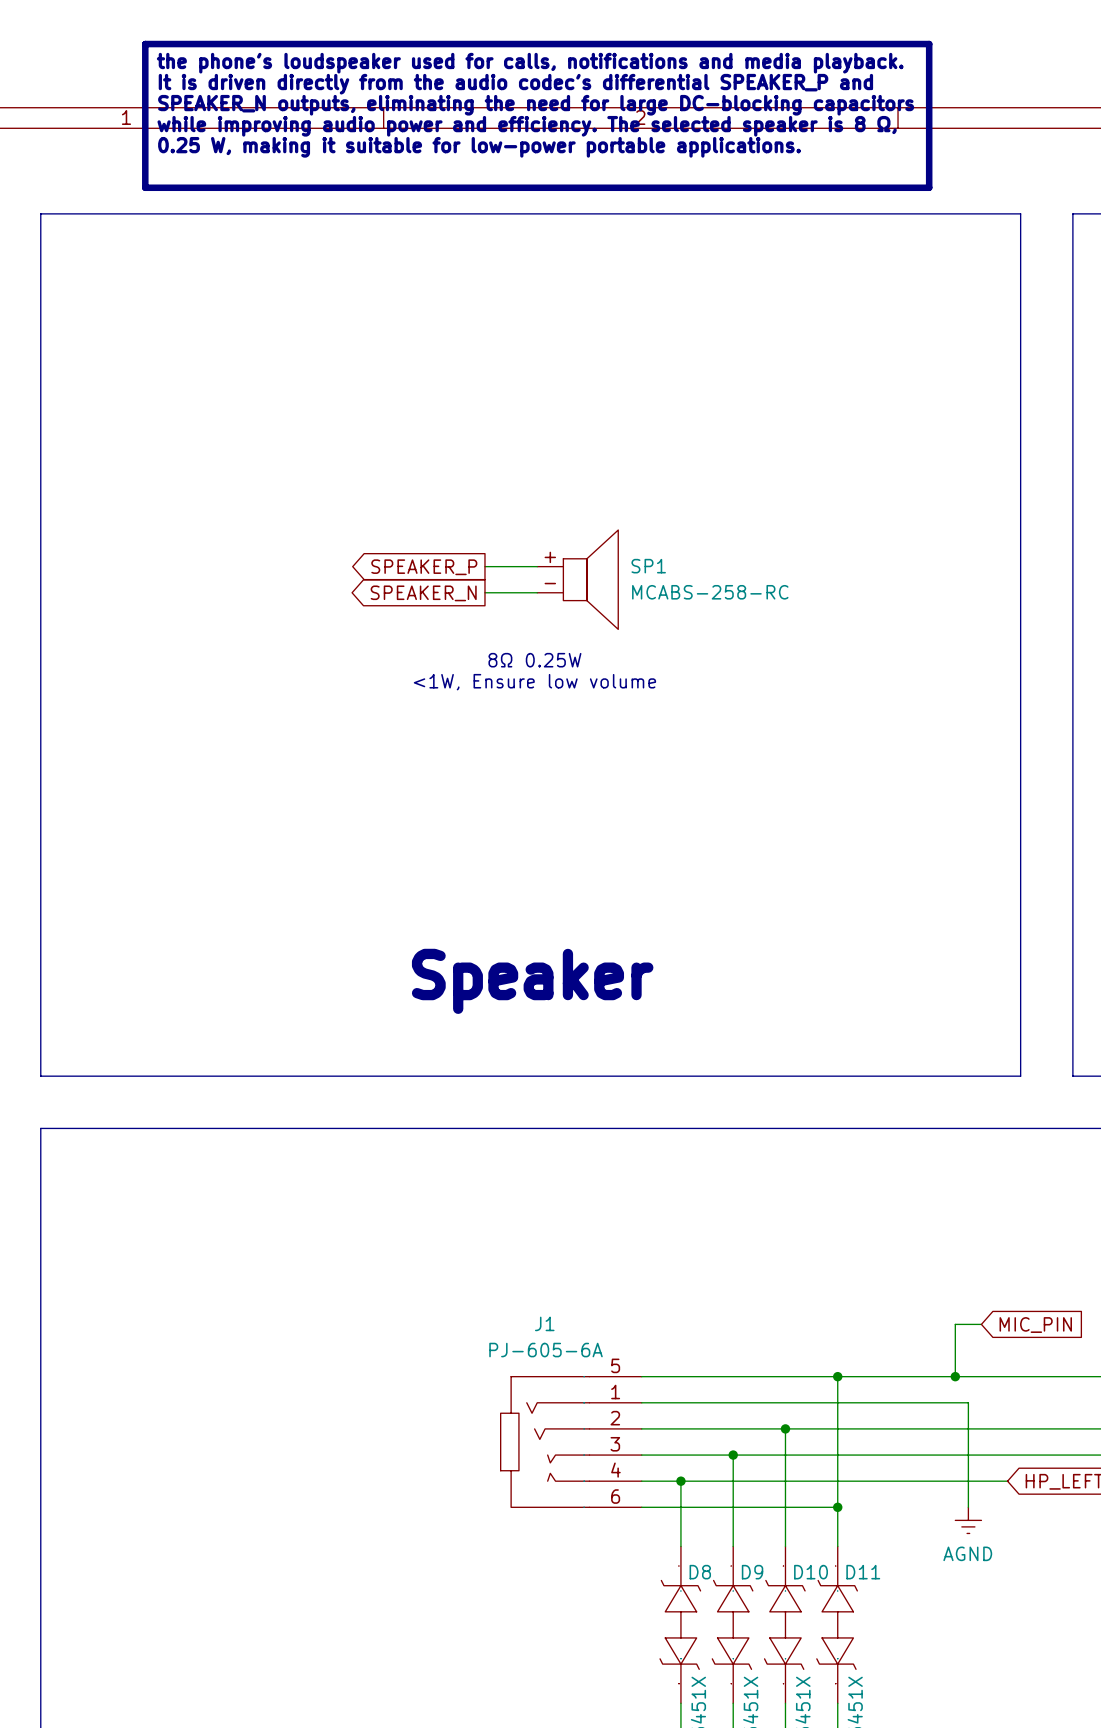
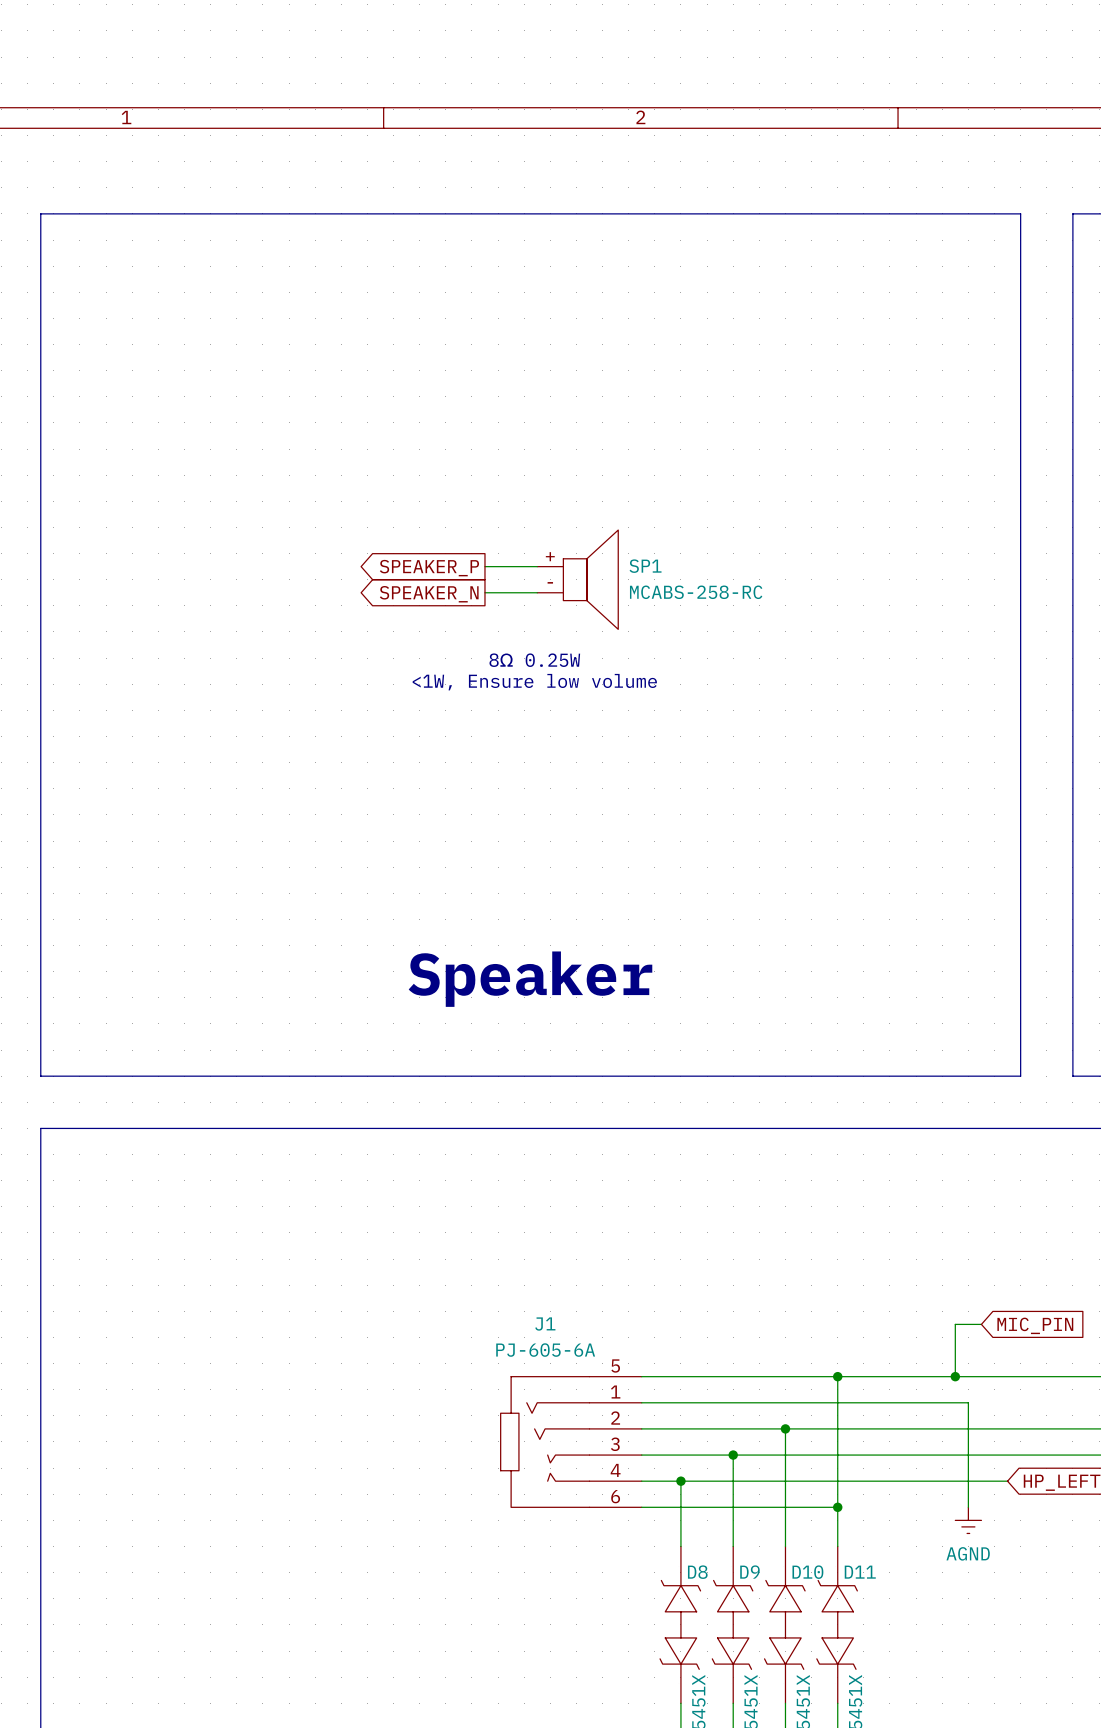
line: (145, 44) (929, 44) (929, 187) (145, 187) (145, 44) -> none
text: the phone's loudspeaker used for calls, notifications and media playback. (530, 63) -> none
text: It is driven directly from the audio codec's differential SPEAKER_P and (515, 84) -> none
text: SPEAKER_N outputs, eliminating the need for large DC-blocking capacitors (536, 105) -> none
text: while improving audio power and efficiency. The selected speaker is 8 Ω, (527, 126) -> none
text: 0.25 W, making it suitable for low-power portable applications. (479, 147) -> none

